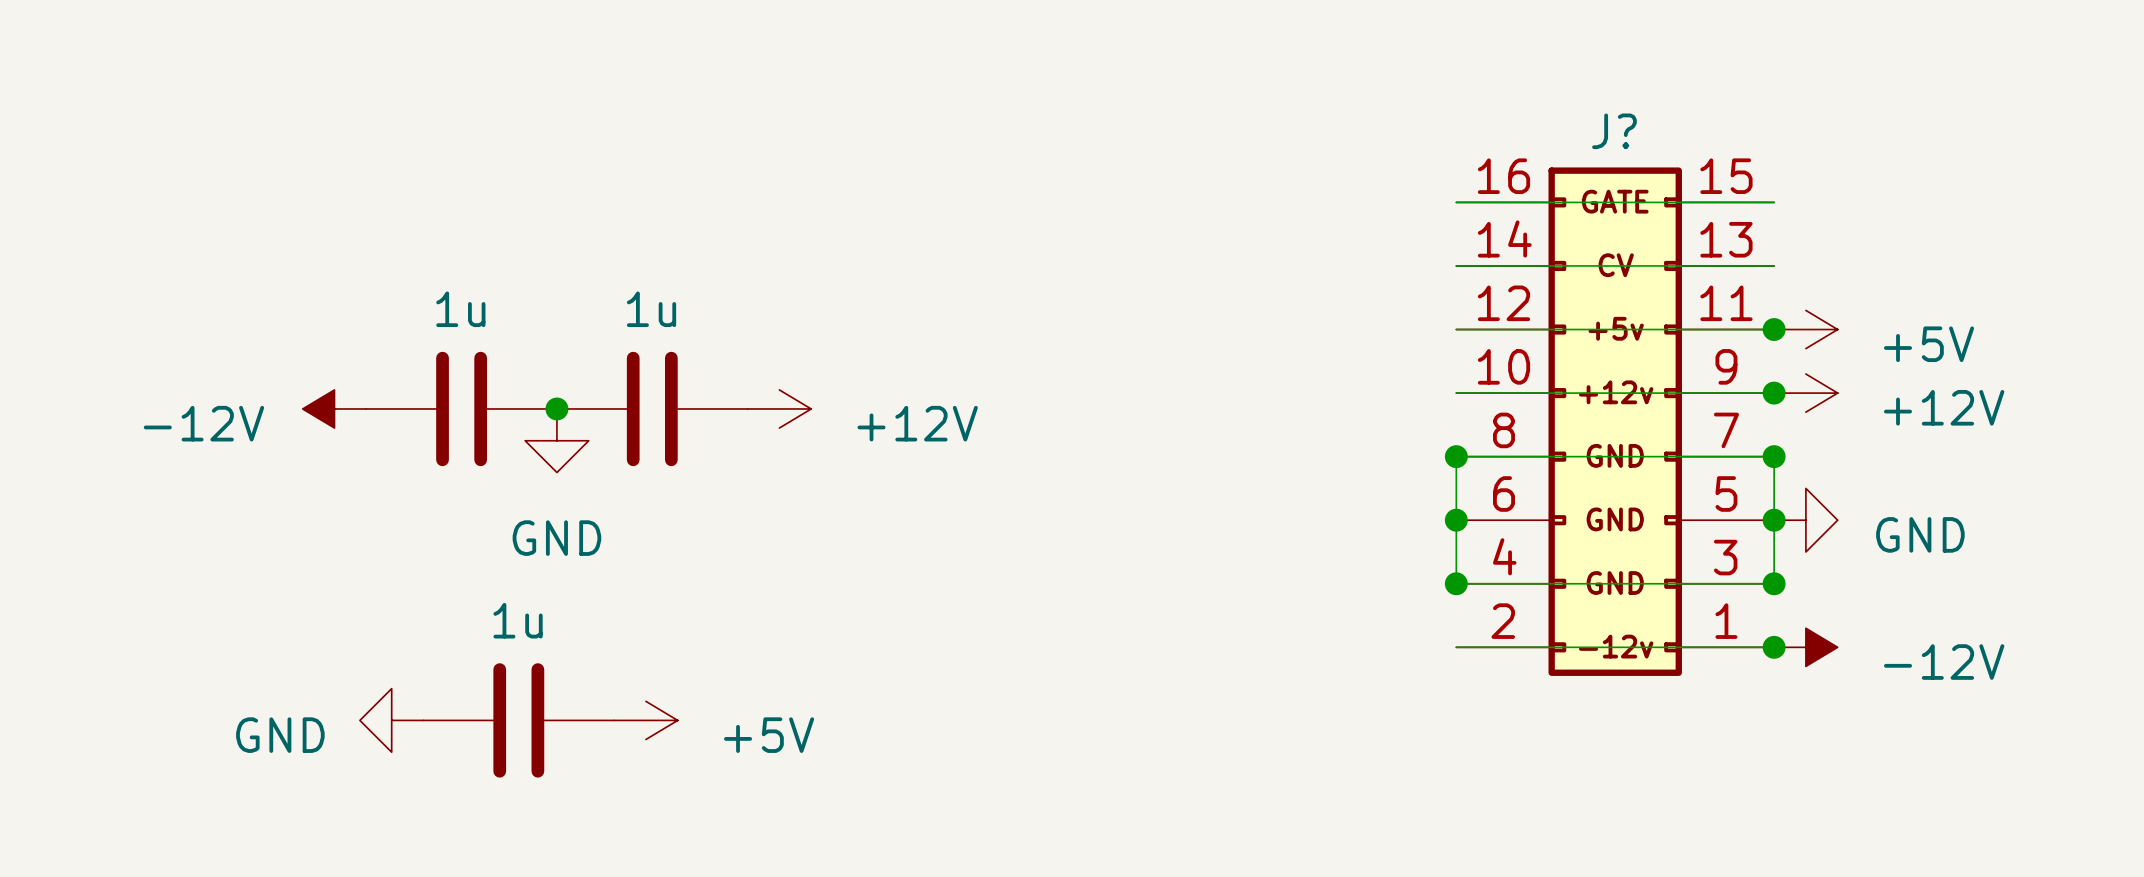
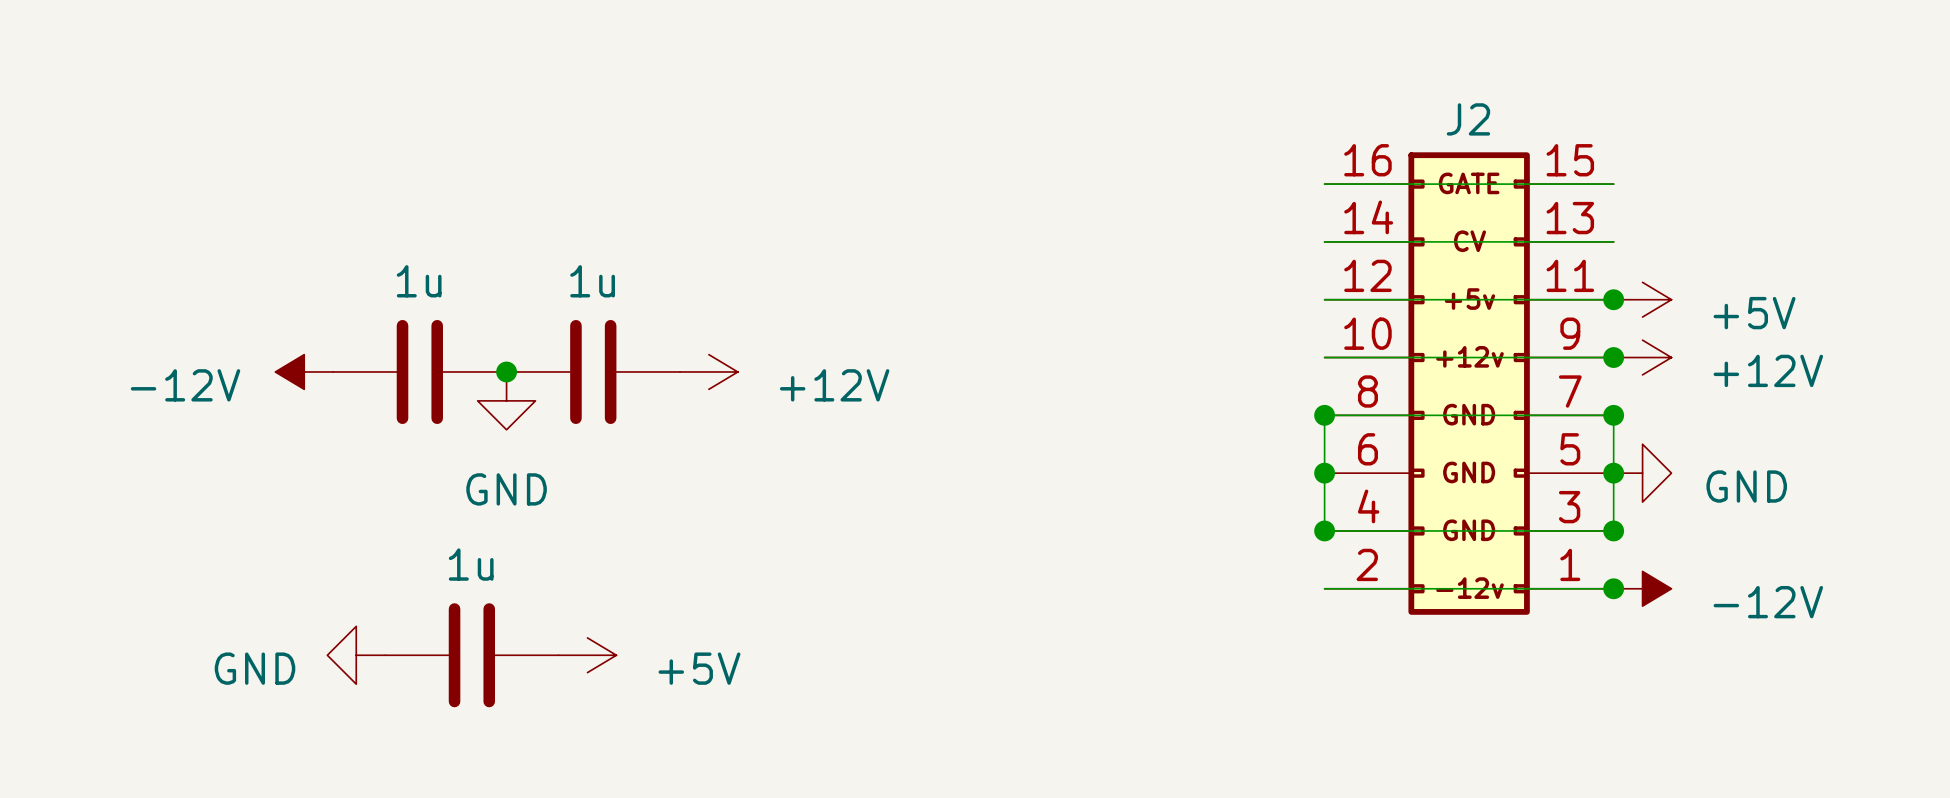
J? name: J? (1614, 131) -> J2 (1468, 119)

